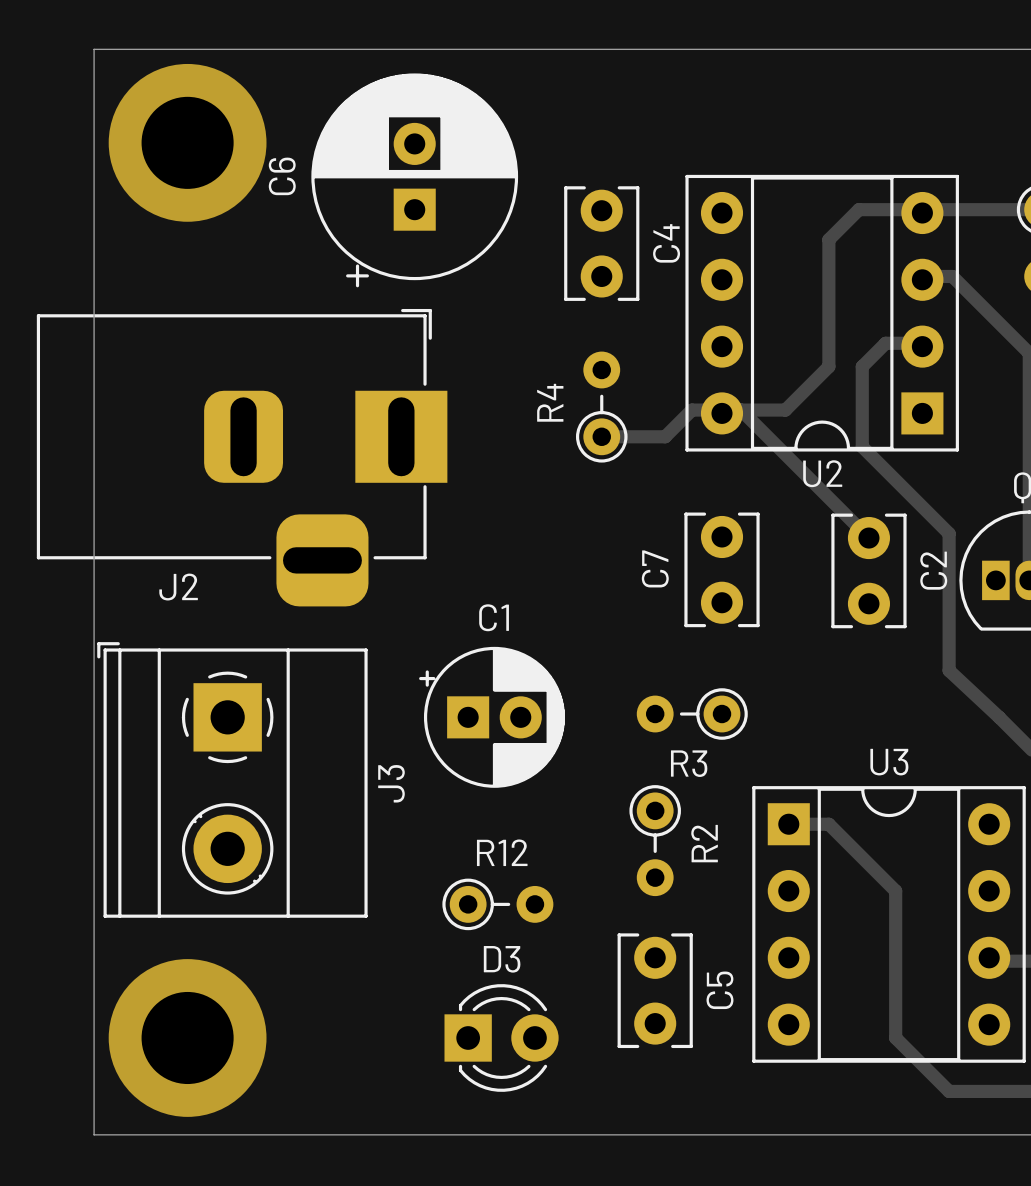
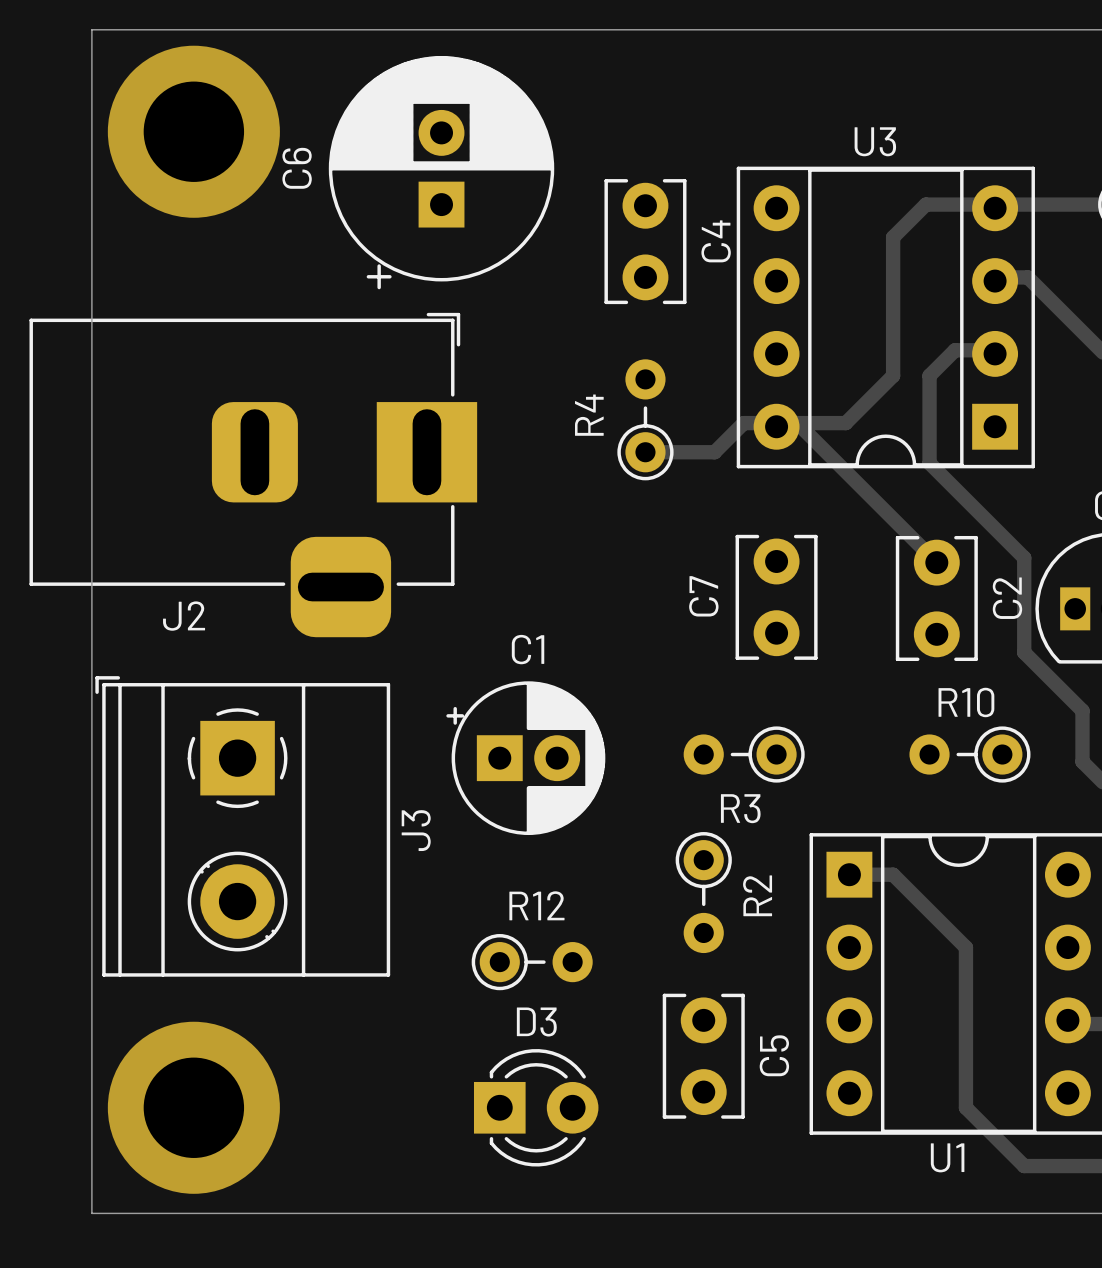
U2 name: U2 (822, 473) -> U3 (875, 141)
track: (949, 620) (949, 670) (1002, 720) -> (1024, 652) (1082, 710) (1082, 761)
R10: none -> (969, 754)
U3 name: U3 (889, 762) -> U1 (947, 1157)

